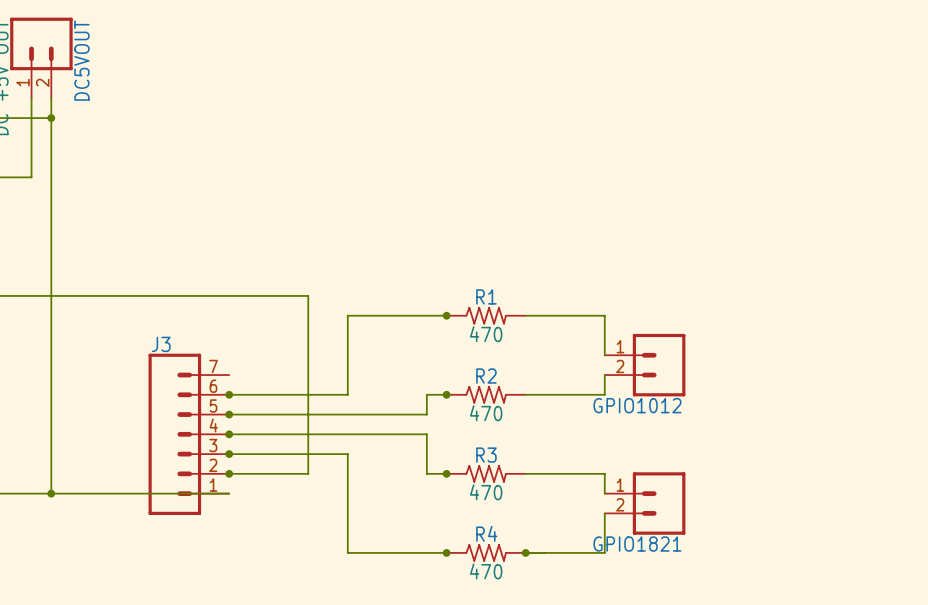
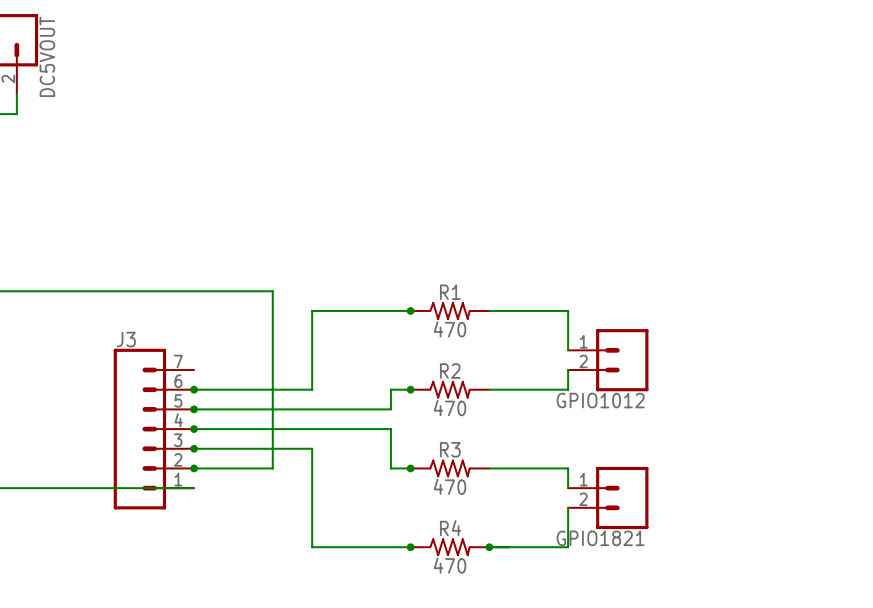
wire: (51, 118) (51, 493) -> none
junction: (51, 118) -> none
junction: (51, 493) -> none

